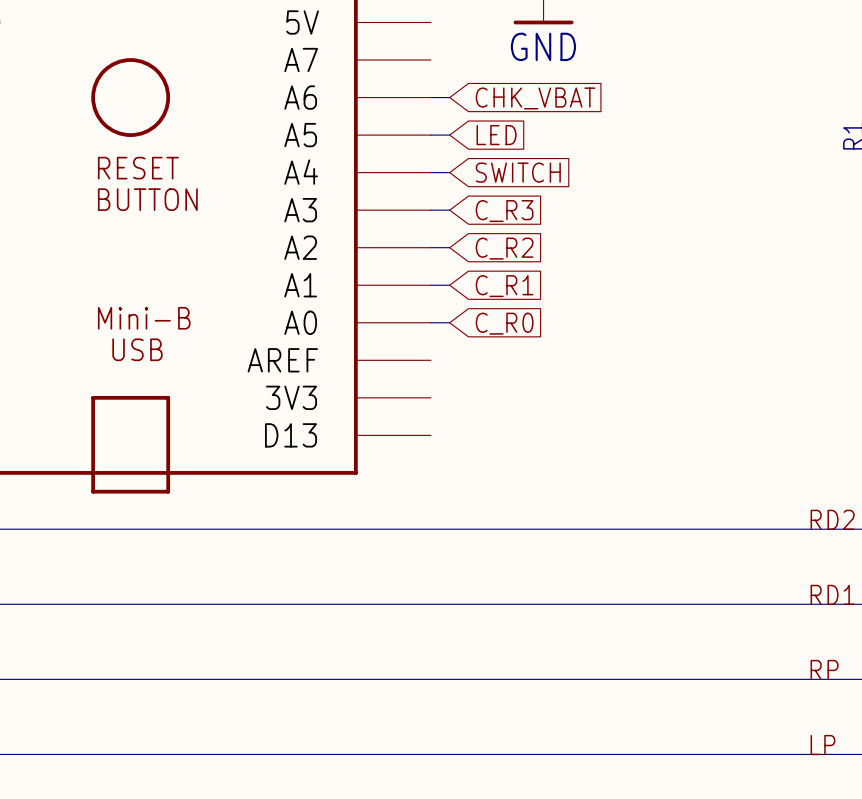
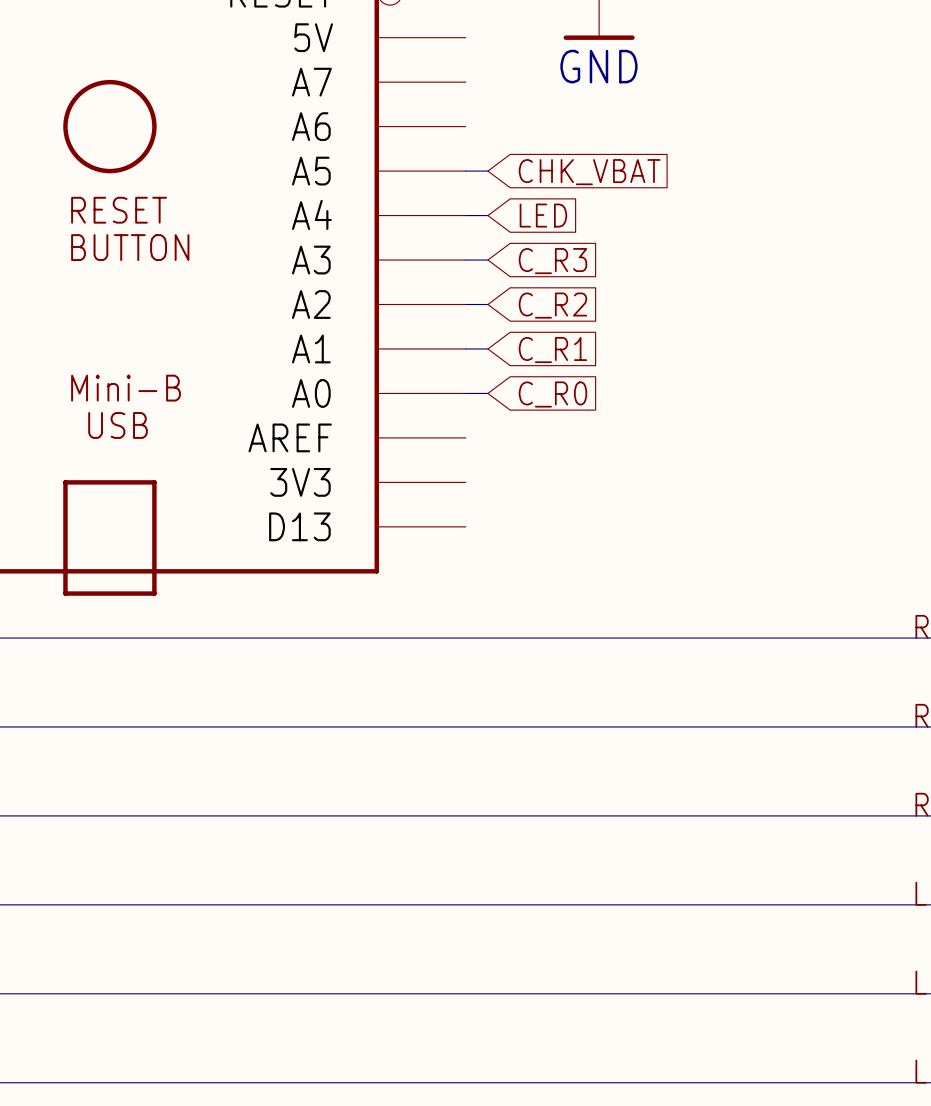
wire: (430, 97) (449, 97) -> none
global label: CHK_VBAT (535, 98) -> none
global label: LED (496, 135) -> CHK_VBAT (589, 172)
global label: SWITCH (518, 172) -> LED (543, 215)

